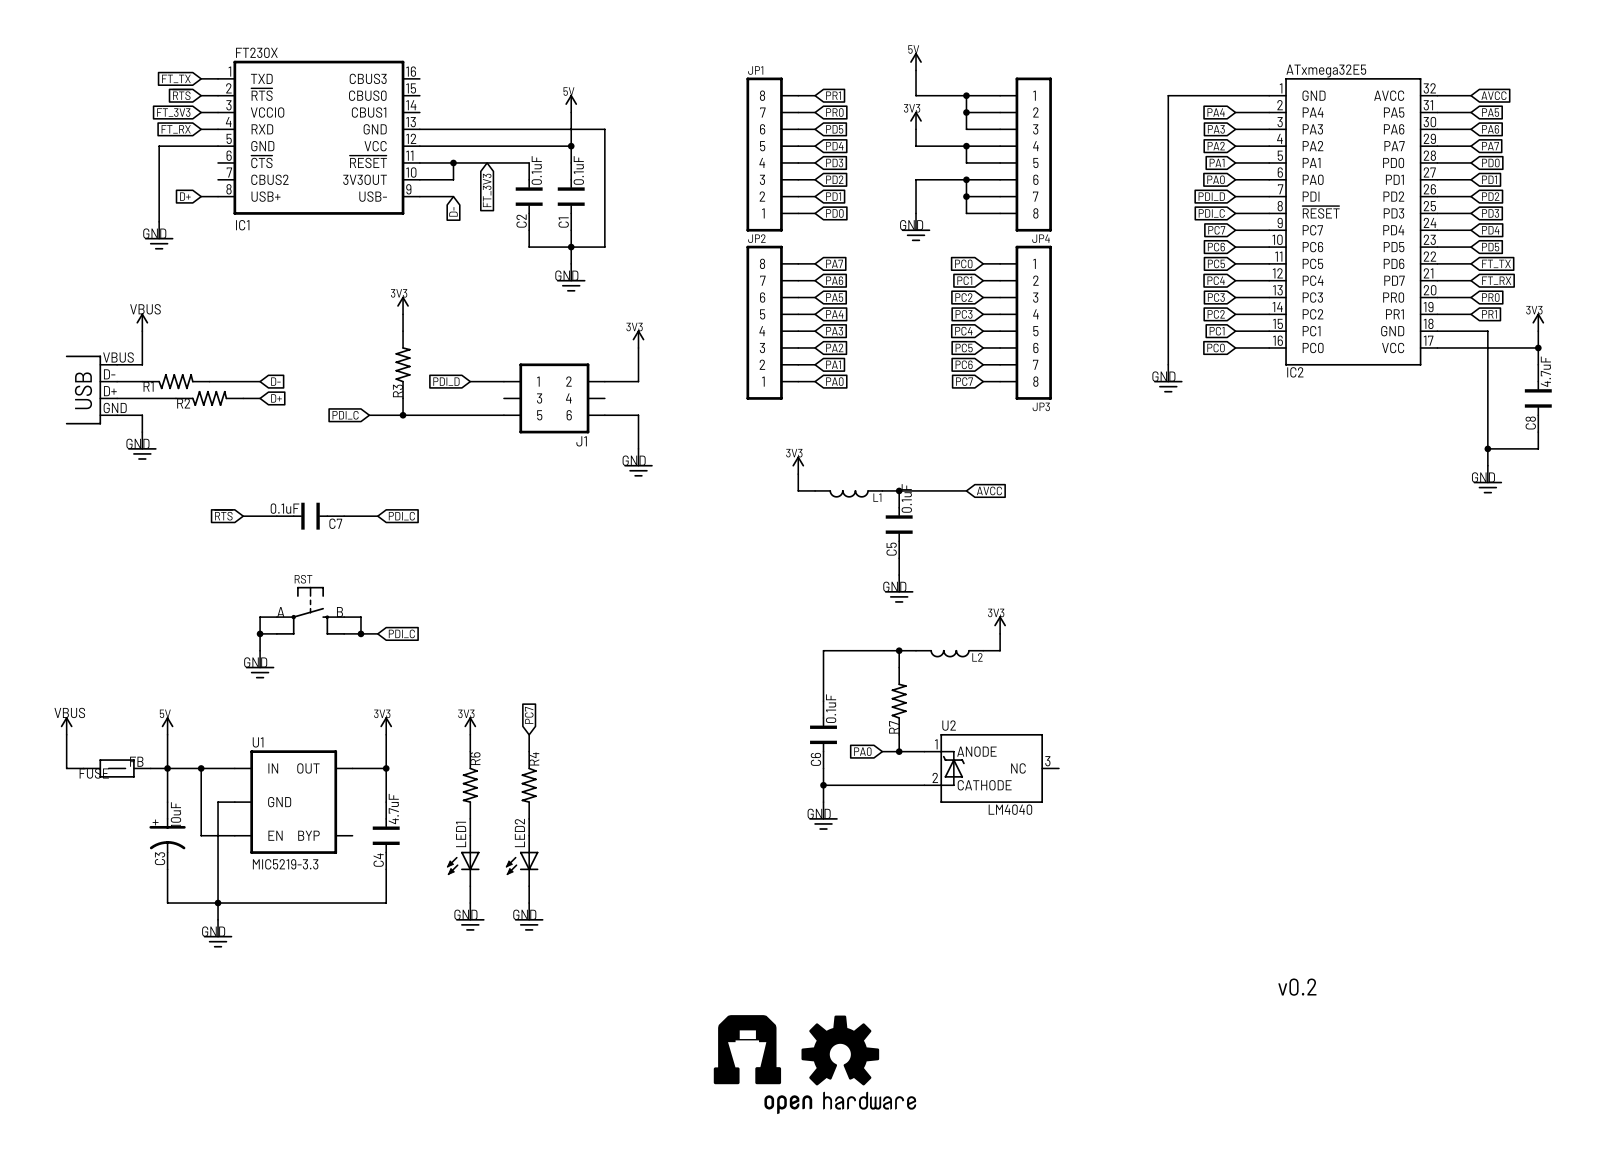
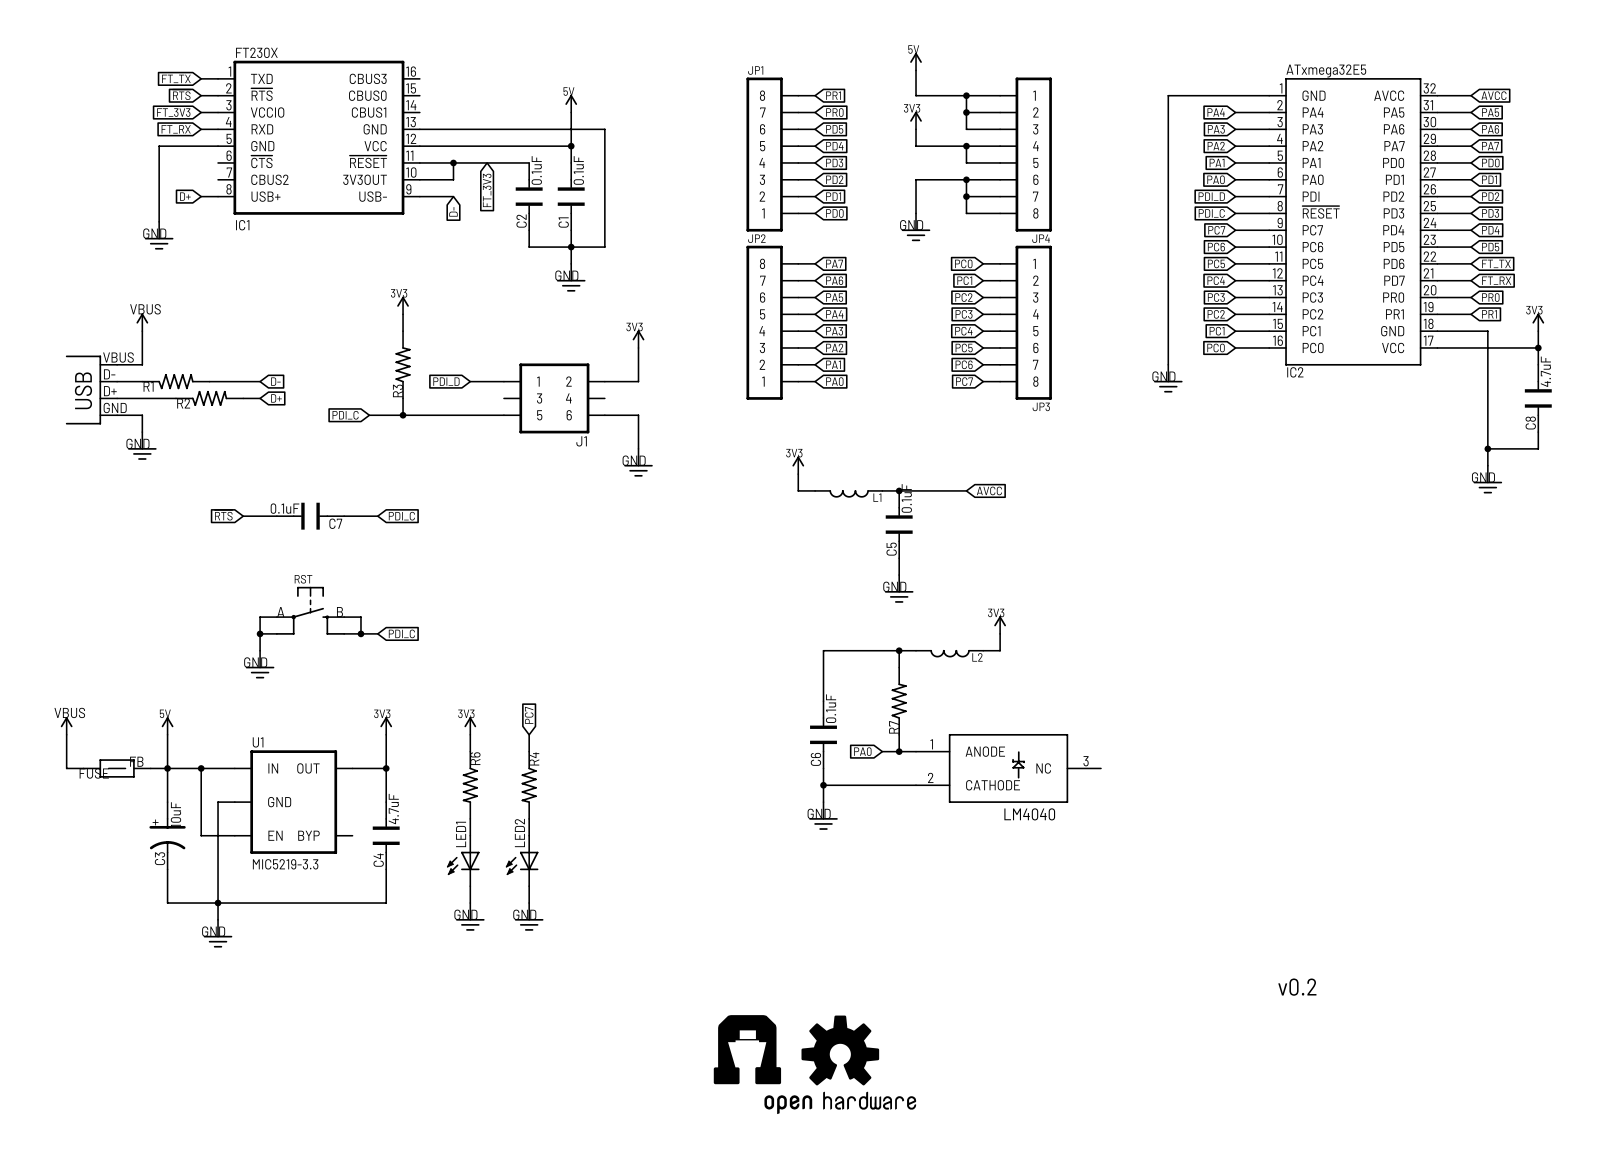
U2: (991, 768) -> none
part: none -> (1008, 768)

